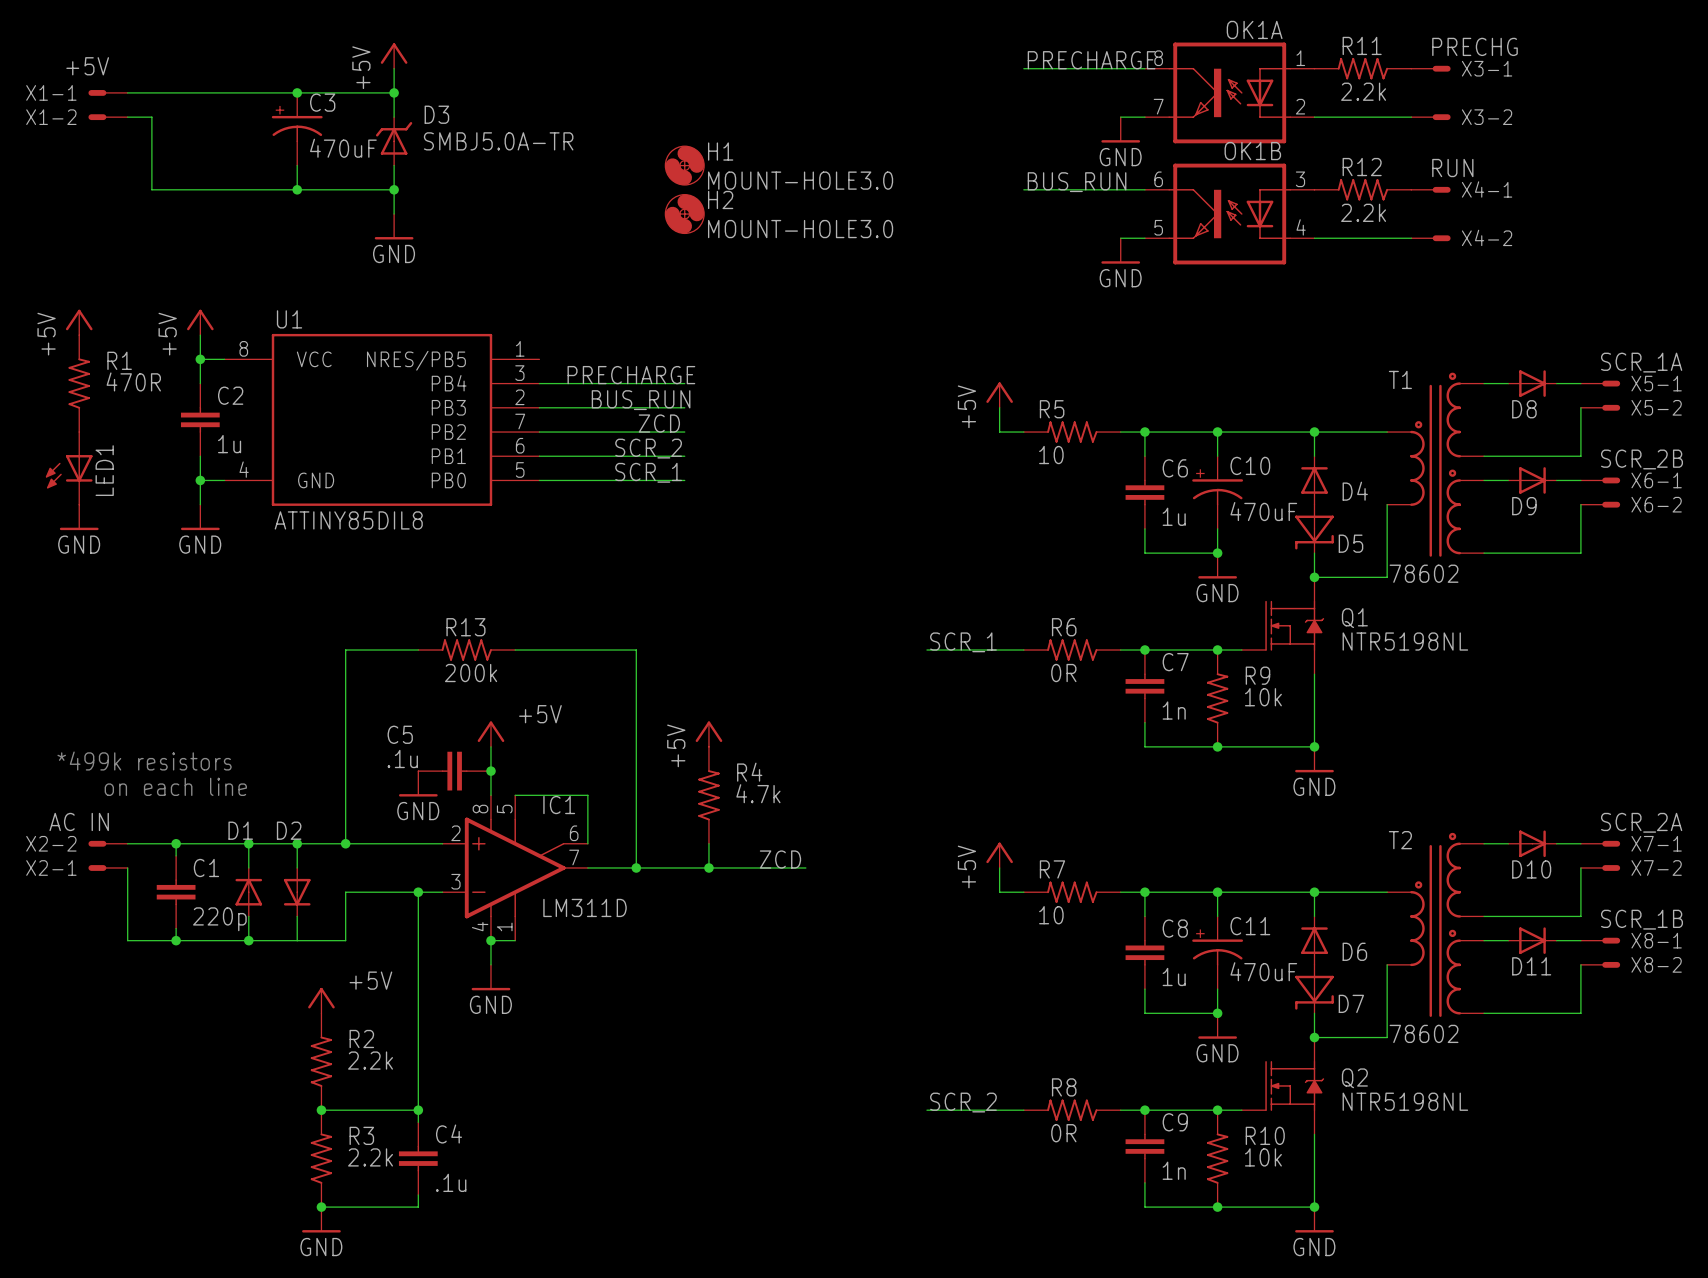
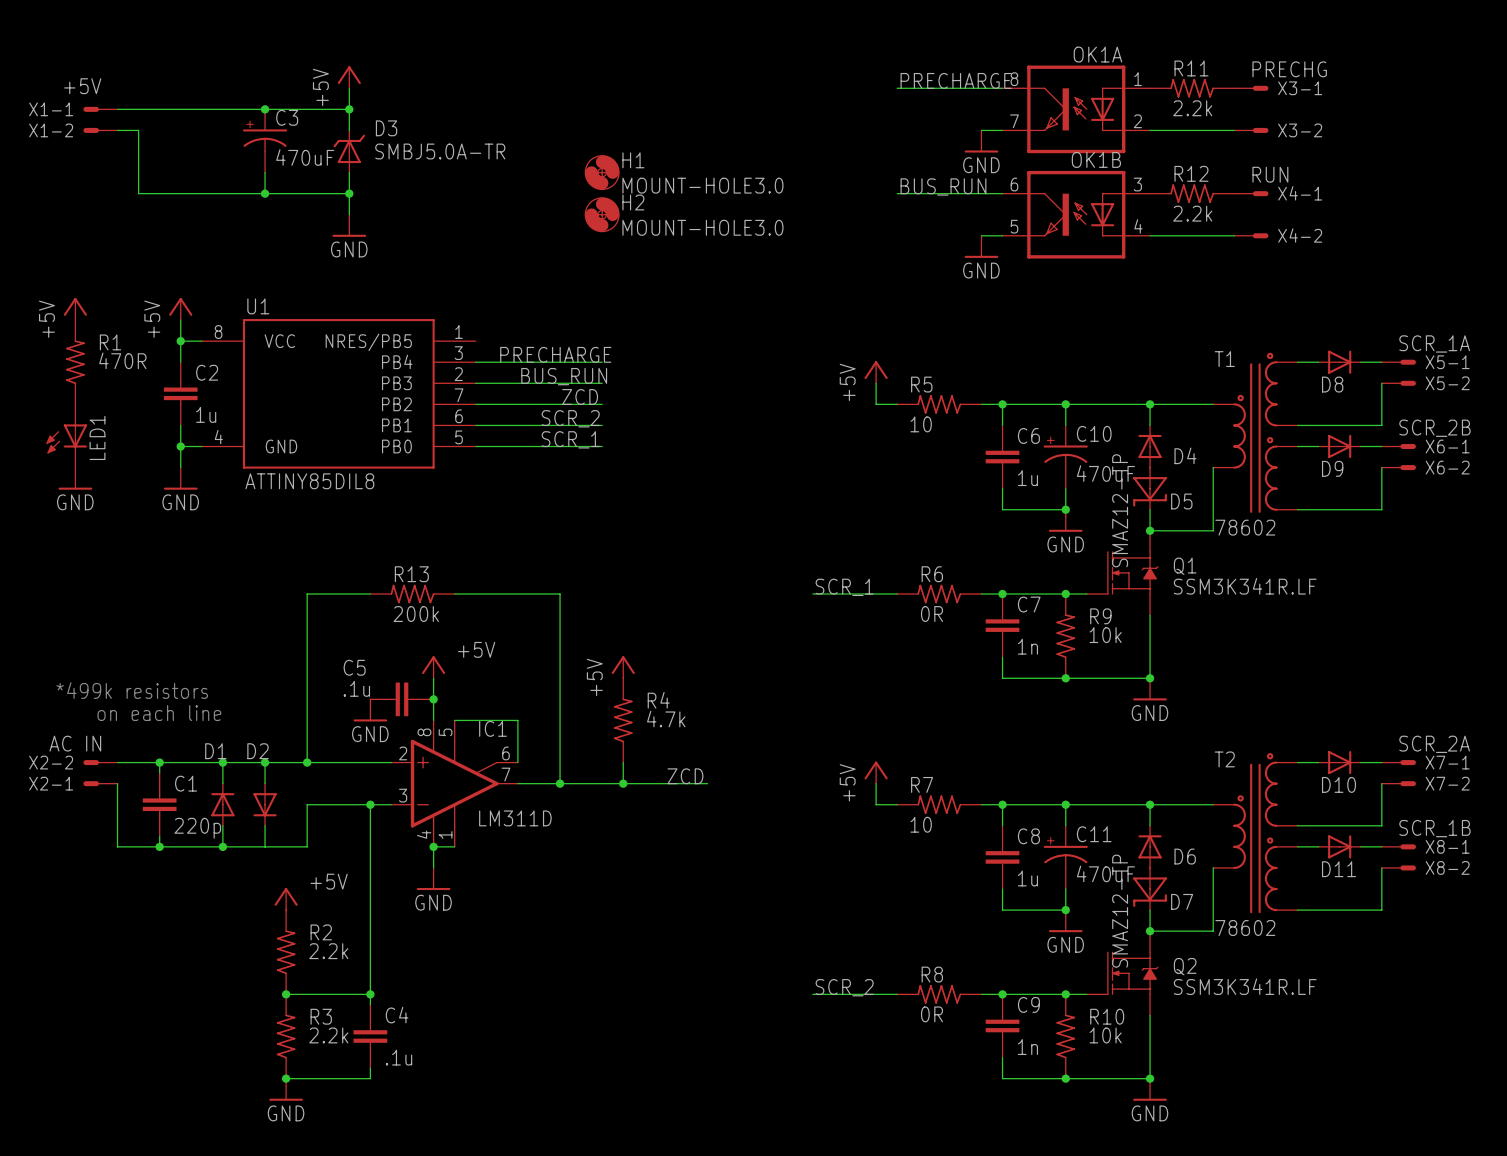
D5 value: none -> SMAZ12-TP (1120, 510)
Q1 value: NTR5198NL (1405, 641) -> SSM3K341R.LF (1245, 586)
D7 value: none -> SMAZ12-TP (1120, 911)
Q2 value: NTR5198NL (1405, 1101) -> SSM3K341R.LF (1245, 986)

